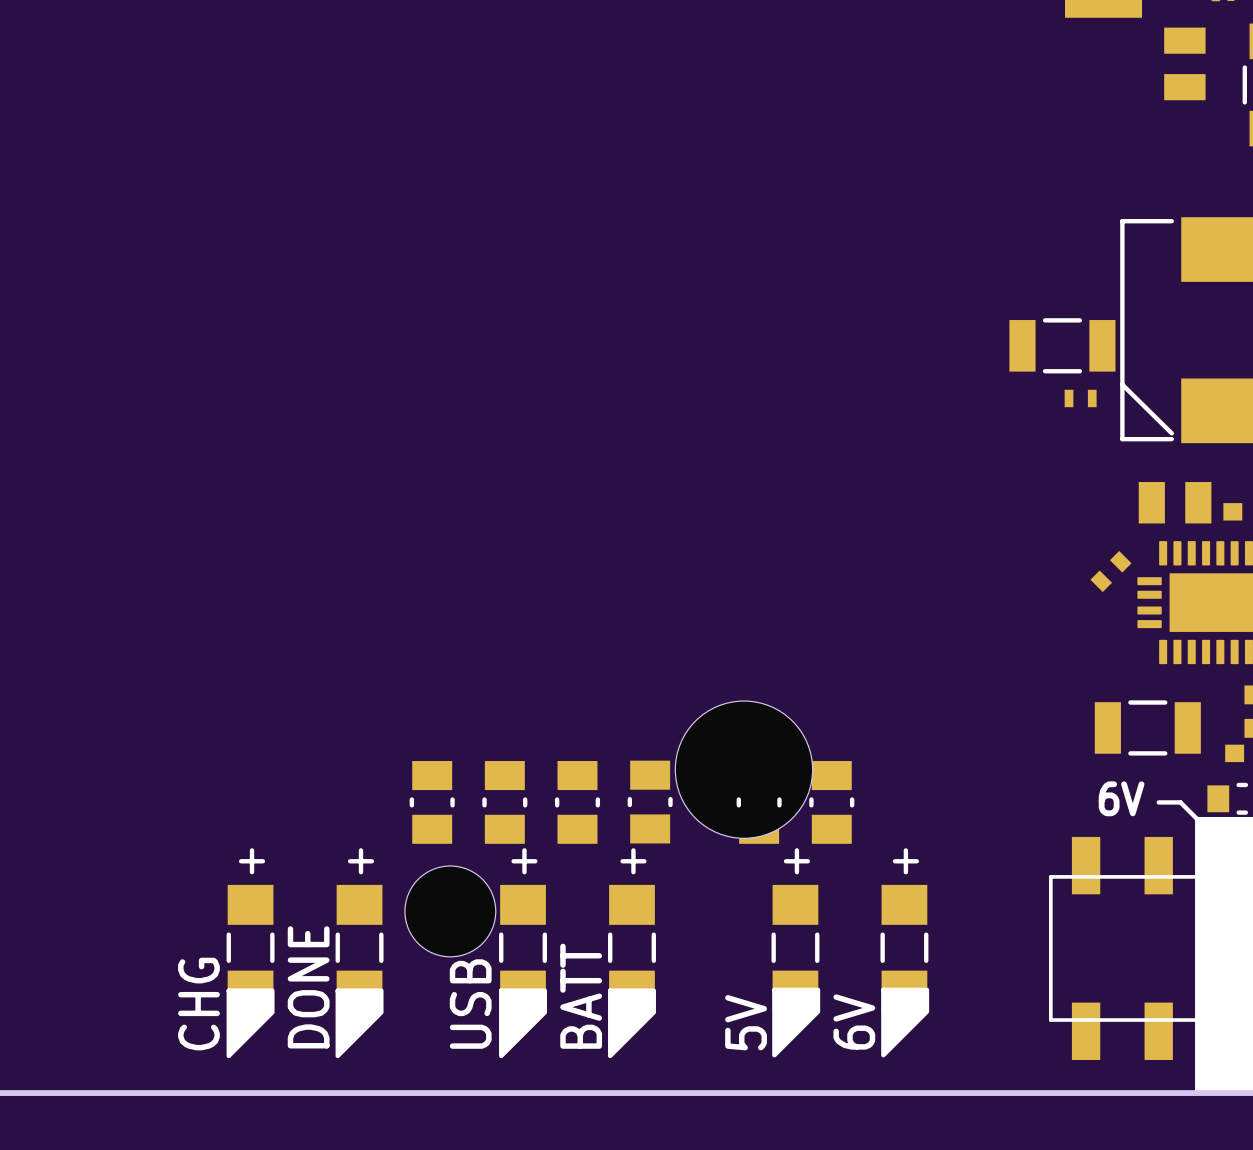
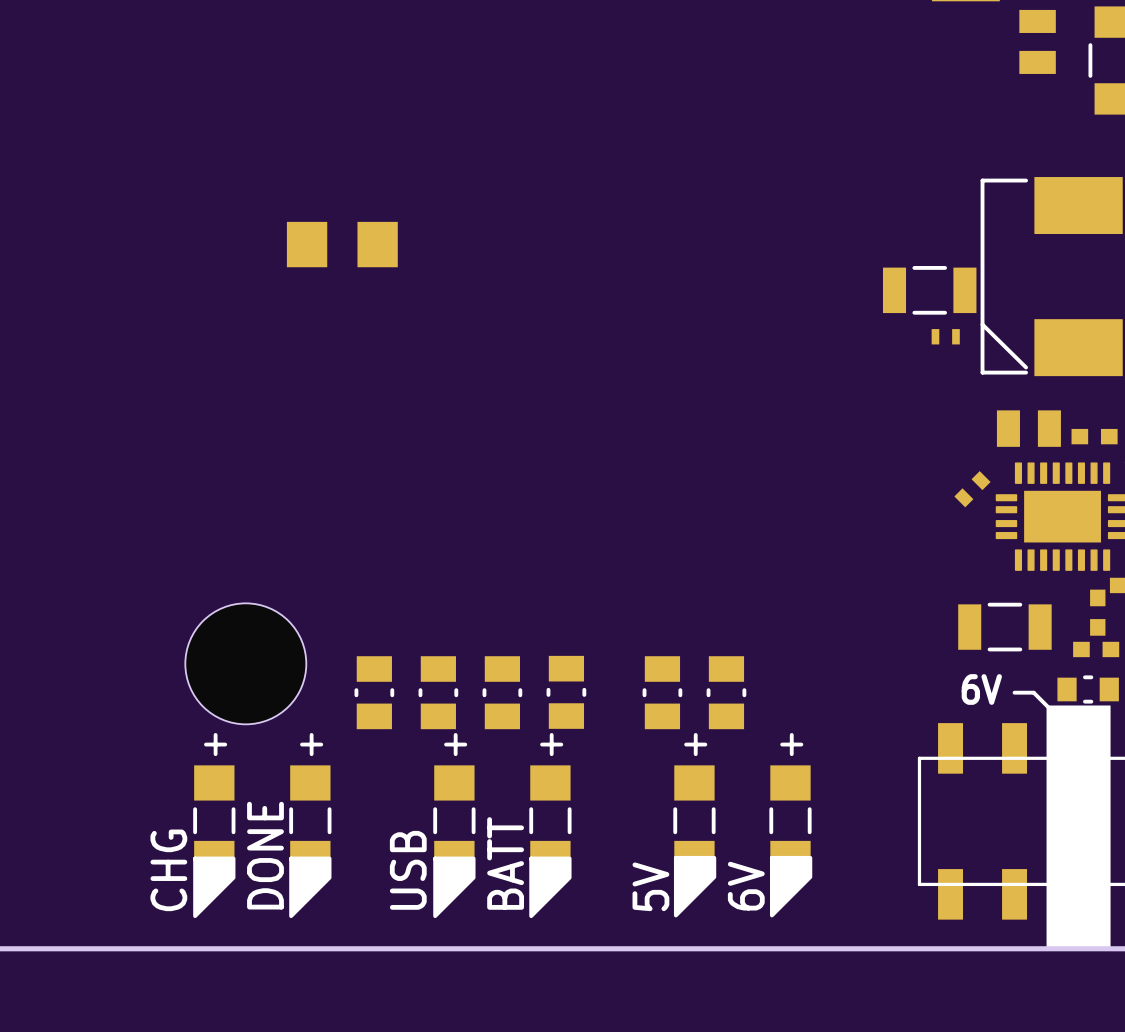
part: none -> (342, 244)
hole position: (743, 769) -> (245, 663)
hole: (450, 911) -> none

